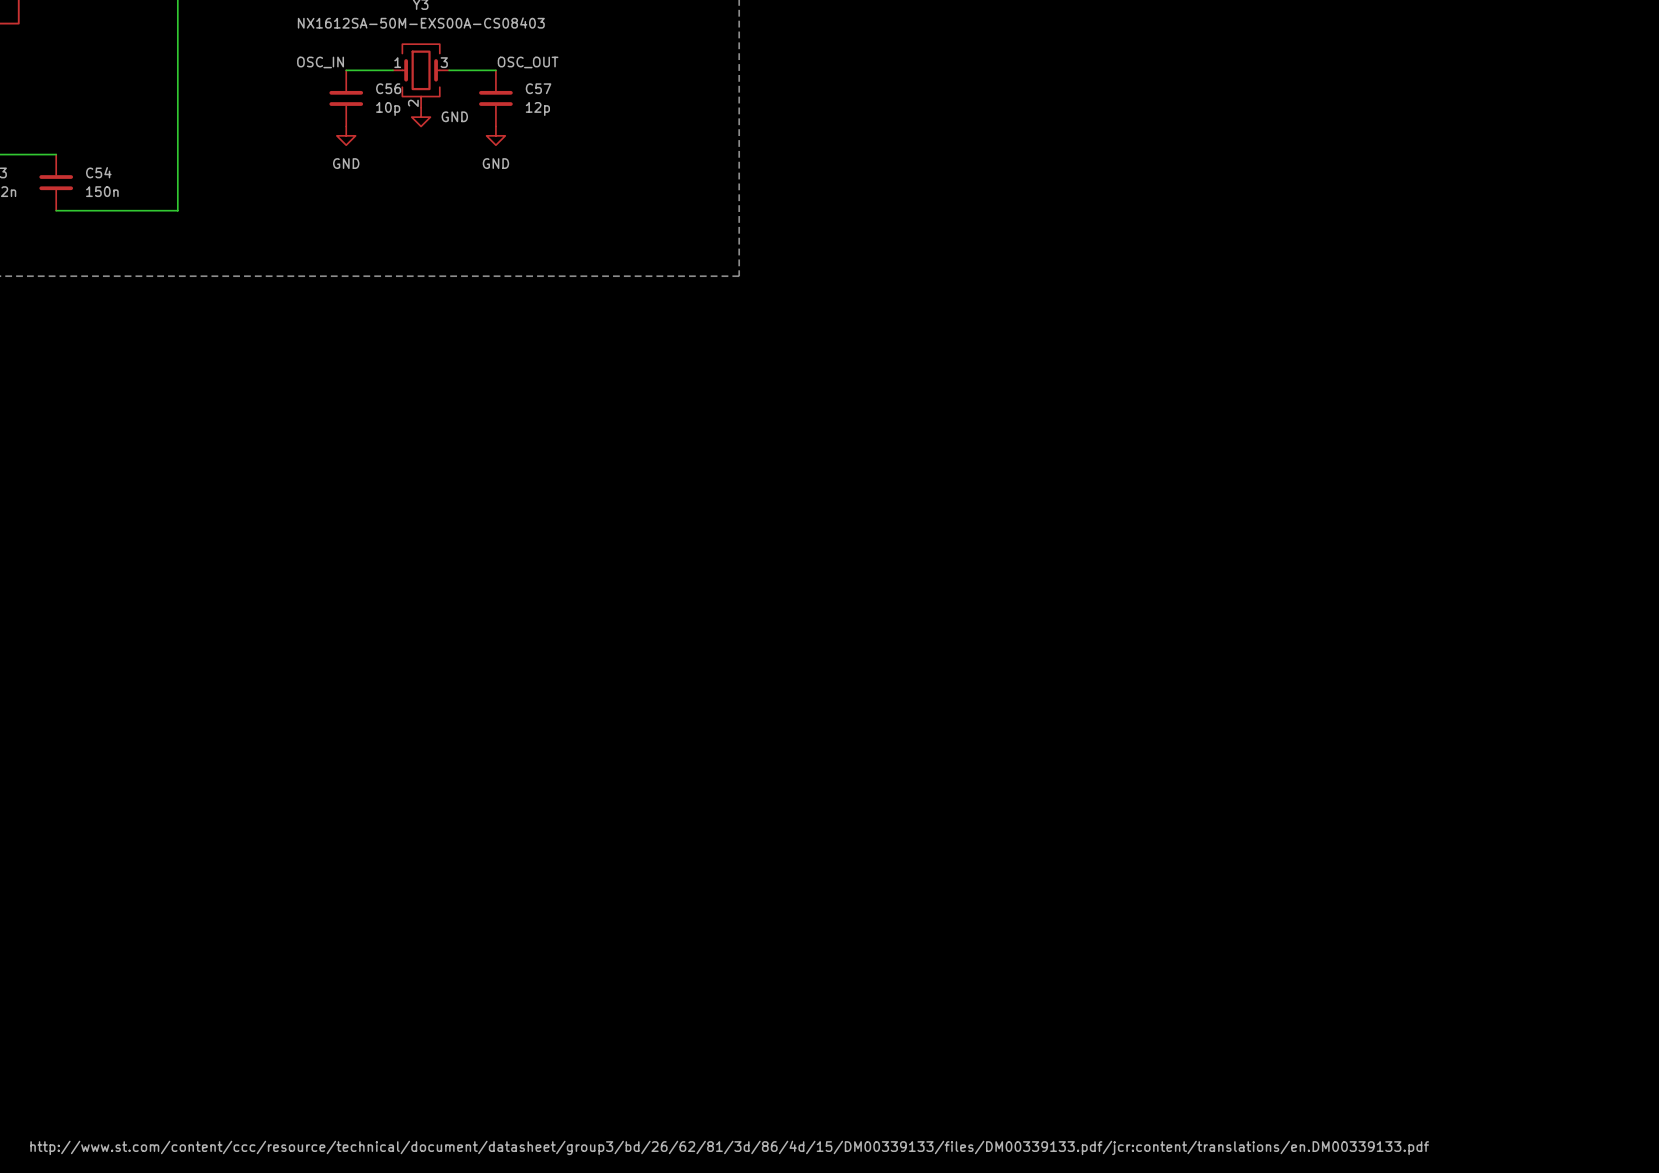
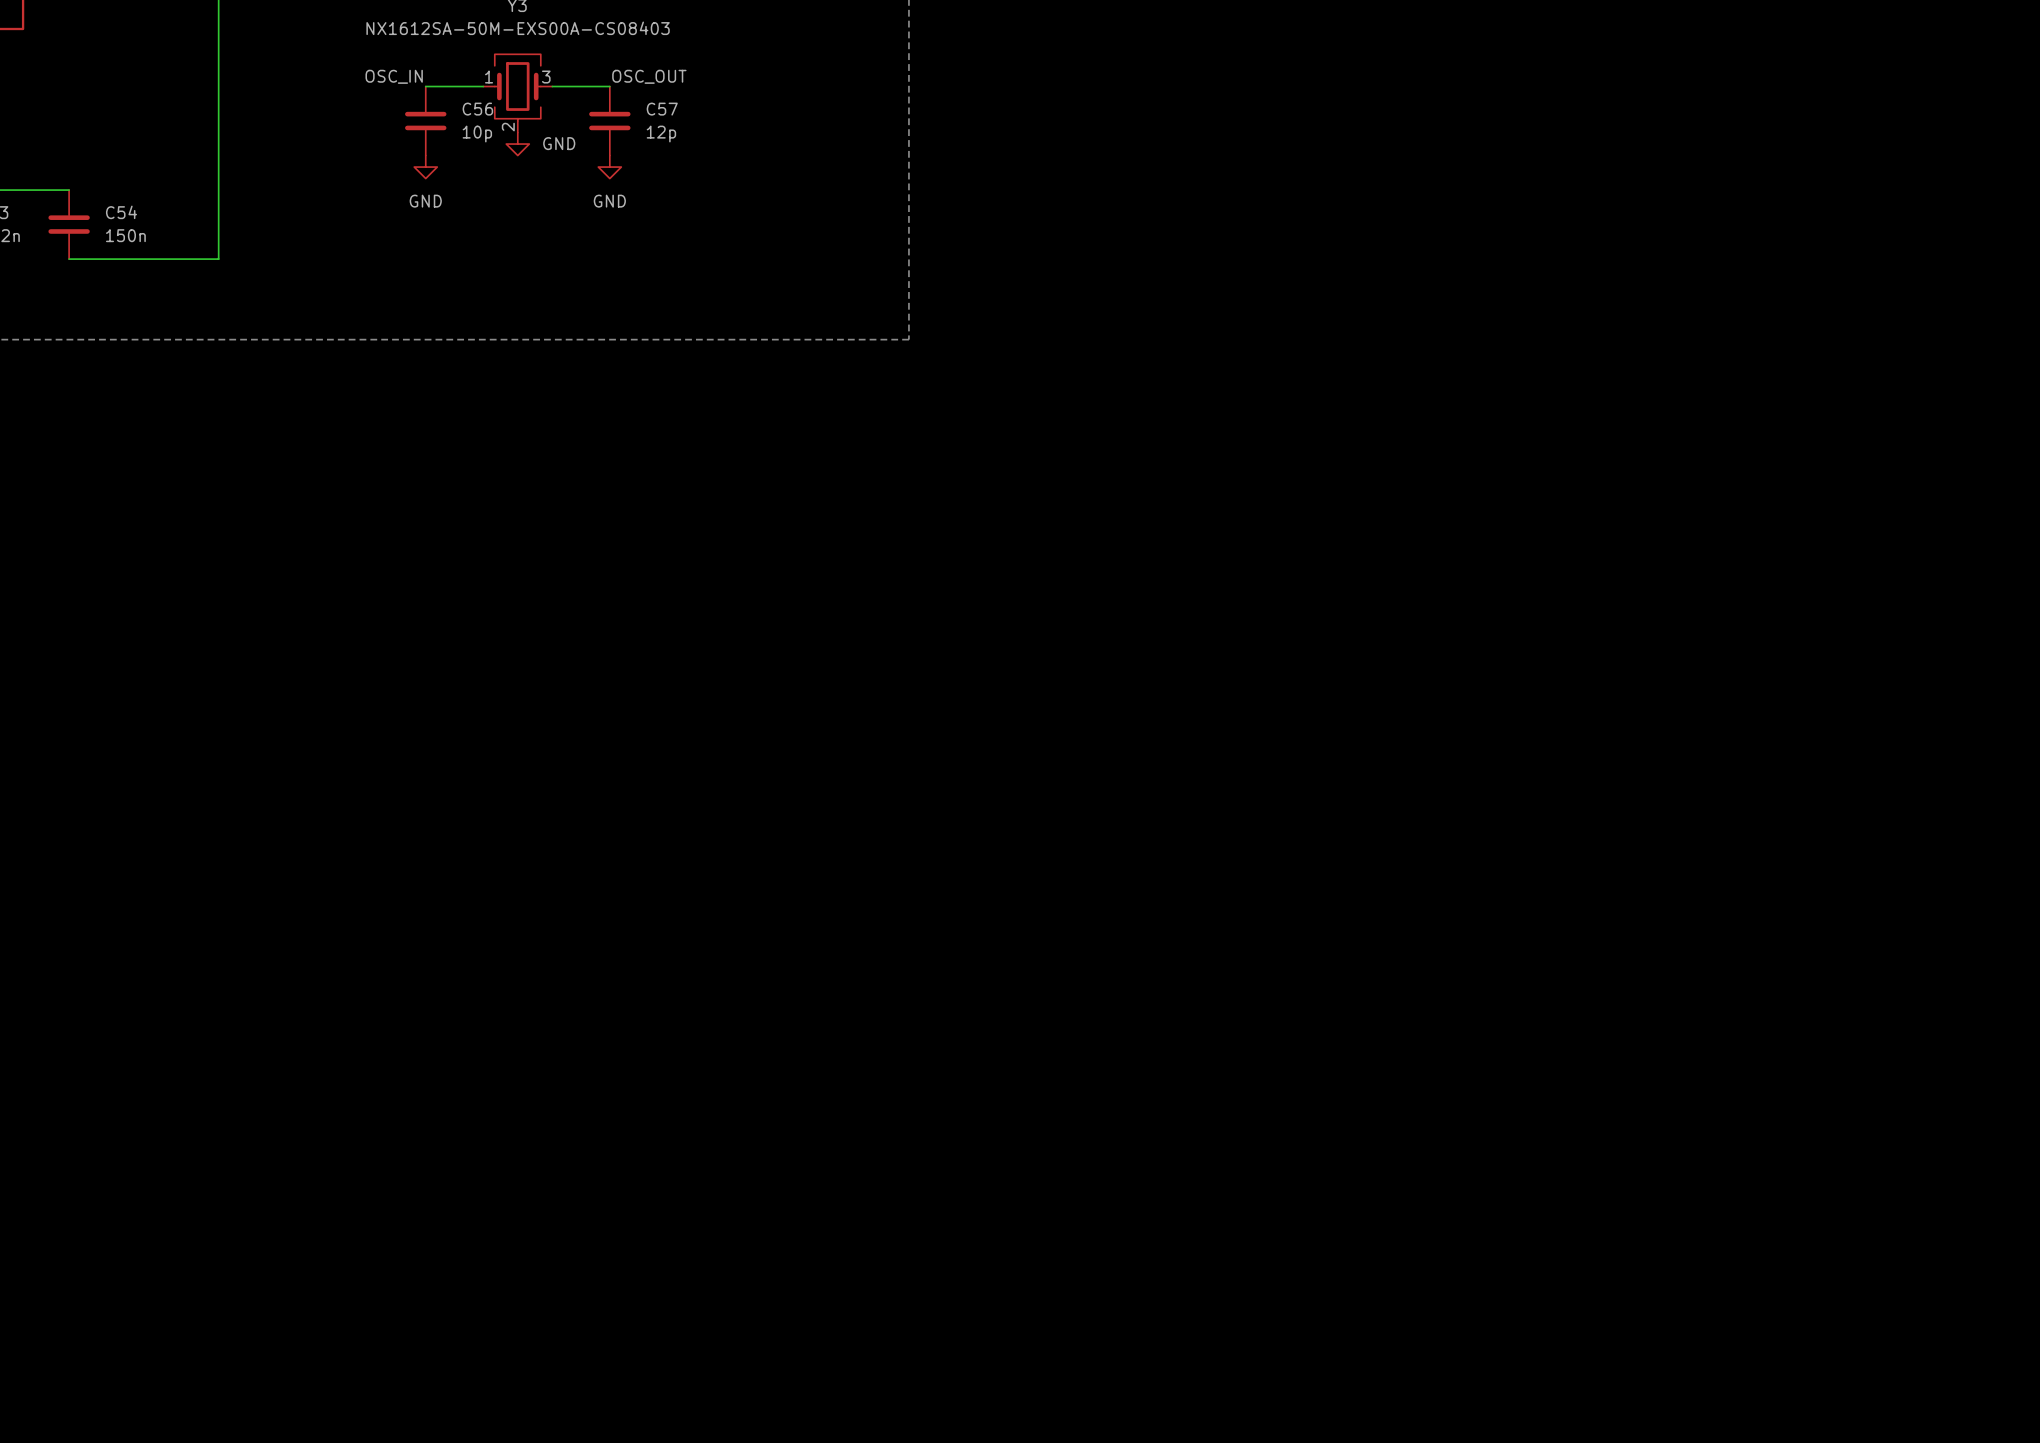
part text: http://www.st.com/content/ccc/resource/technical/document/datasheet/group3/bd/26/62/81/3d/86/4d/15/DM00339133/files/DM00339133.pdf/jcr:content/translations/en.DM00339133.pdf (729, 1147) -> none

